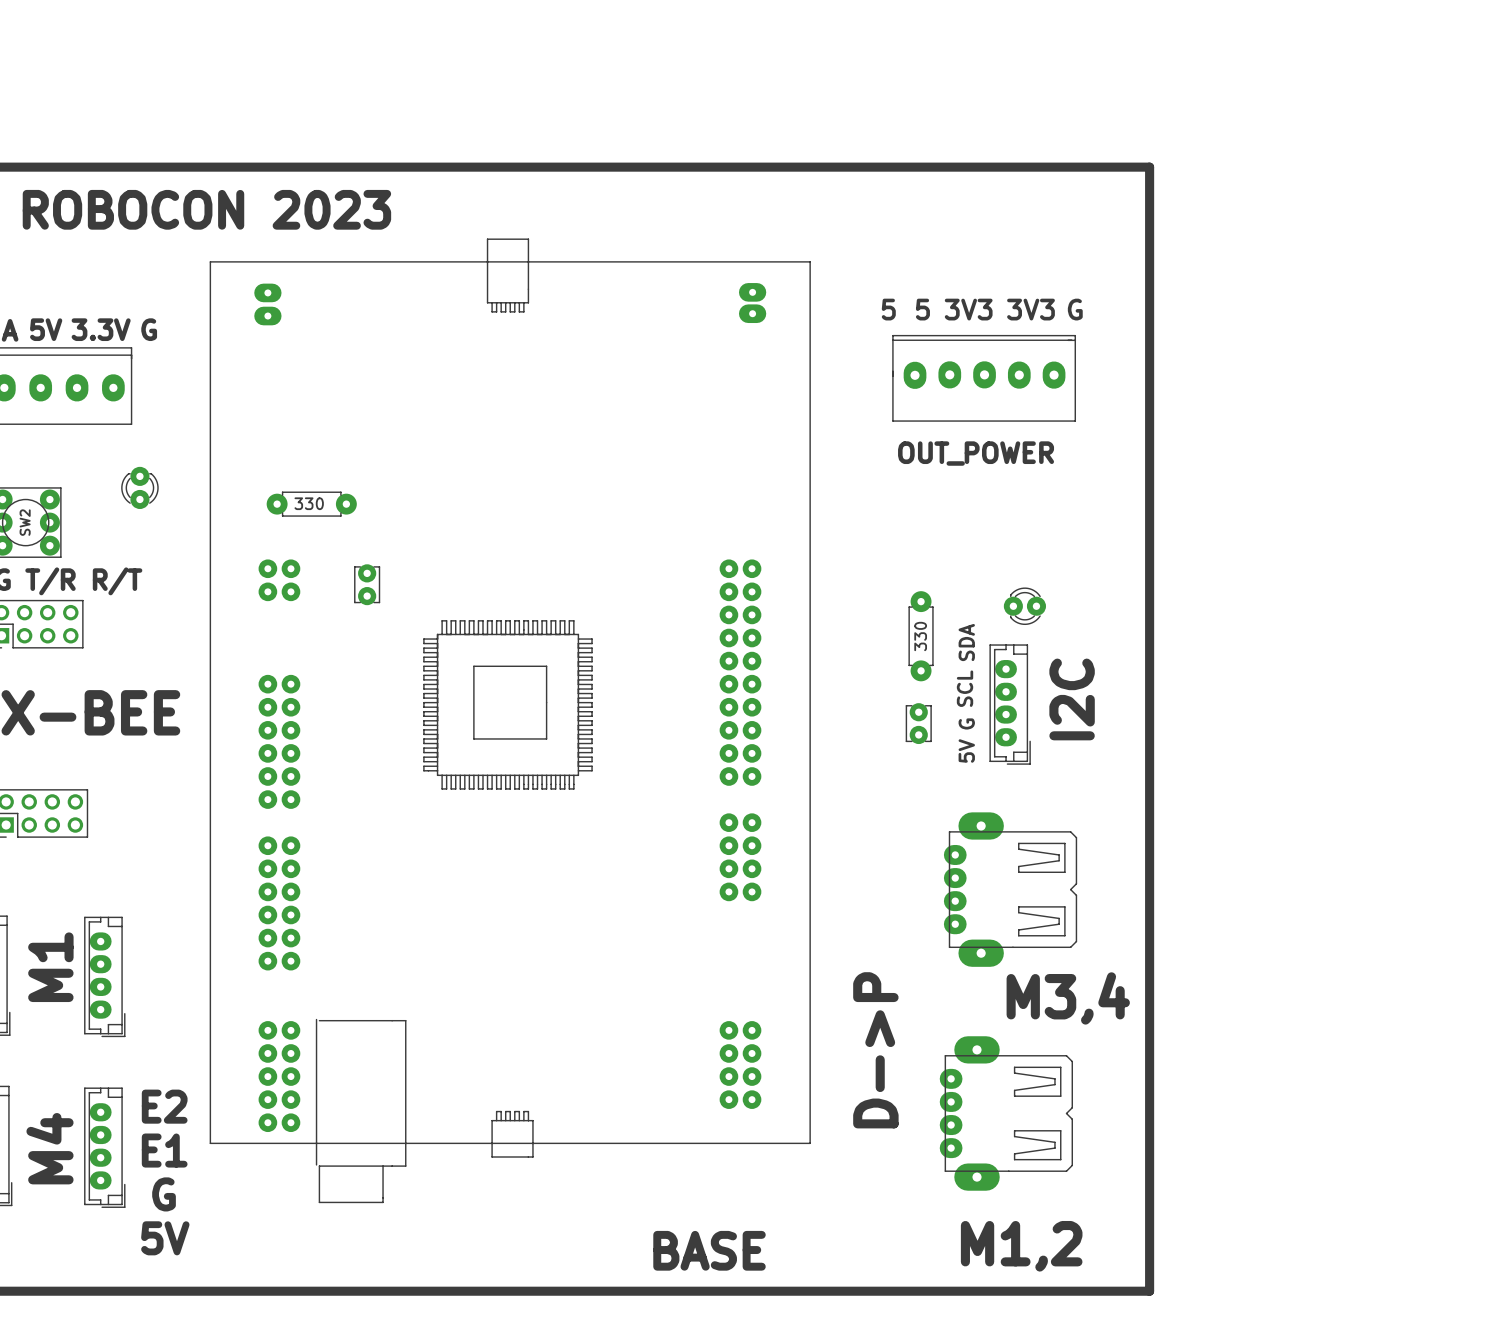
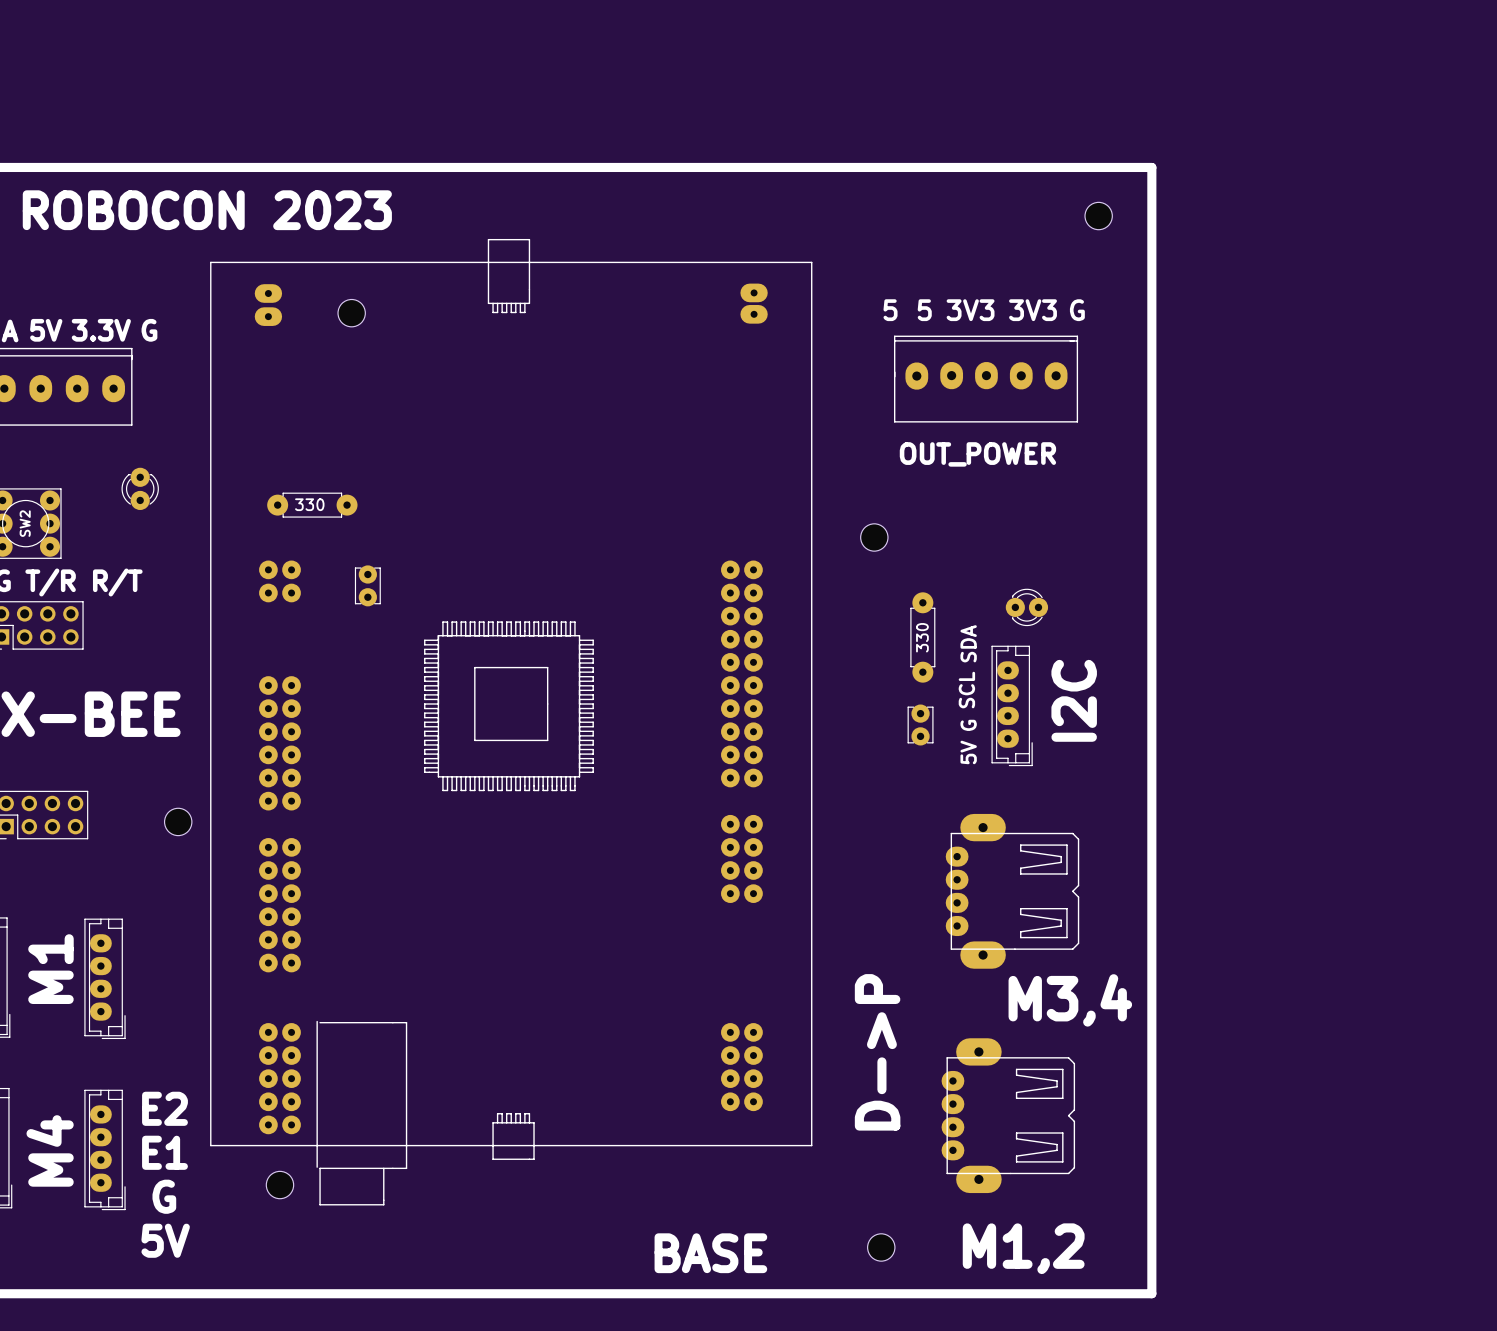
part: none -> (1098, 216)
part: none -> (351, 313)
part: none -> (874, 537)
part: none -> (178, 821)
part: none -> (279, 1185)
part: none -> (881, 1247)

